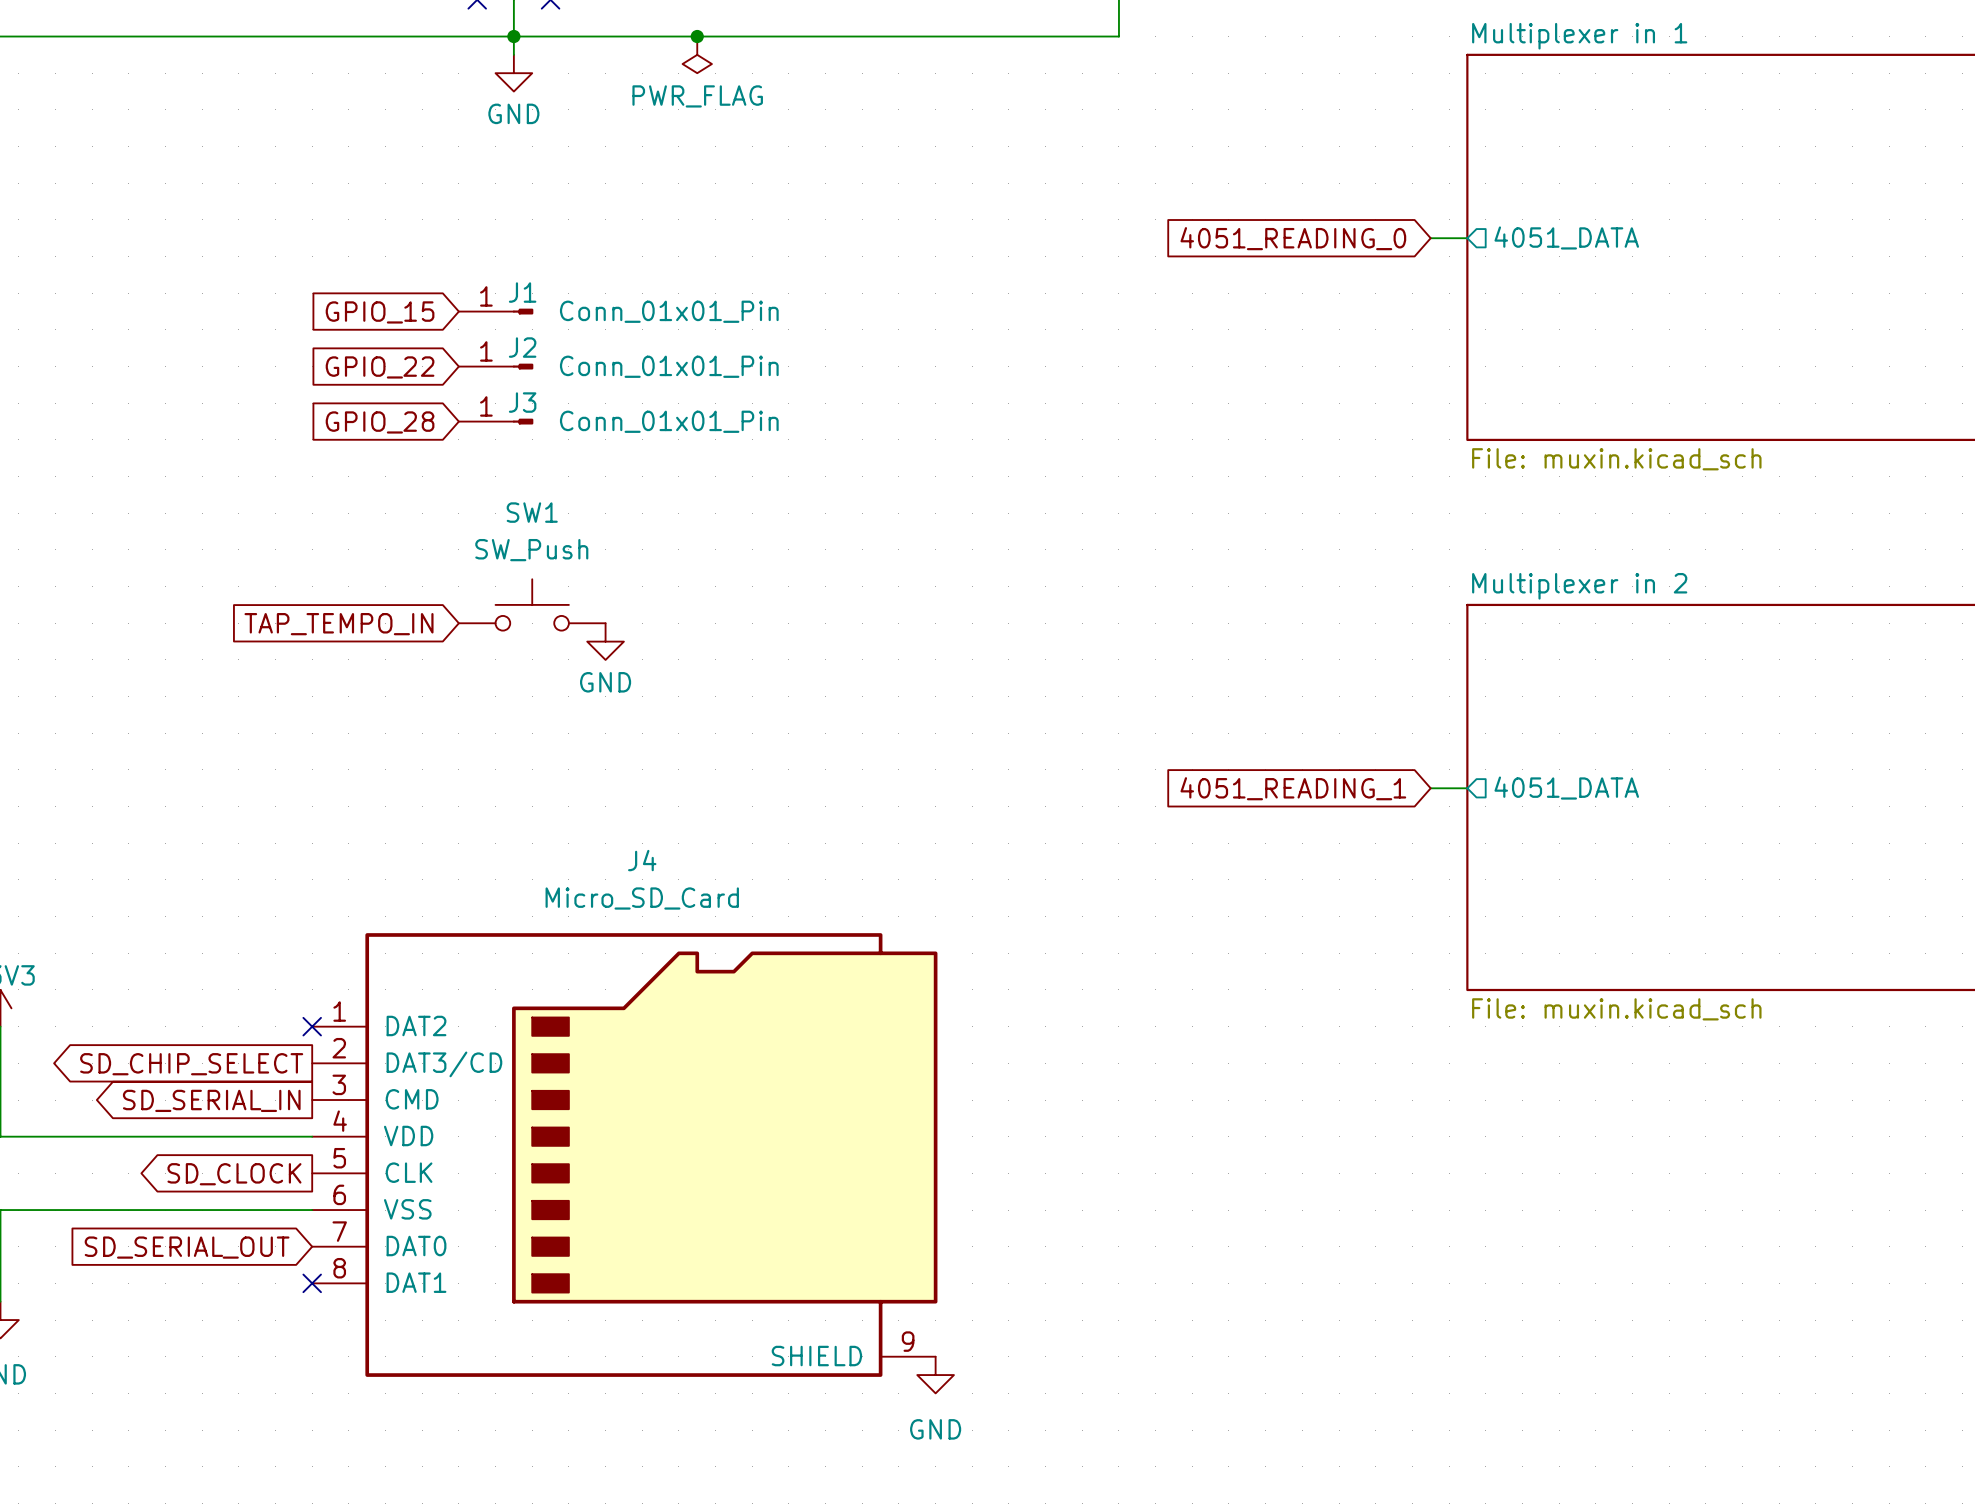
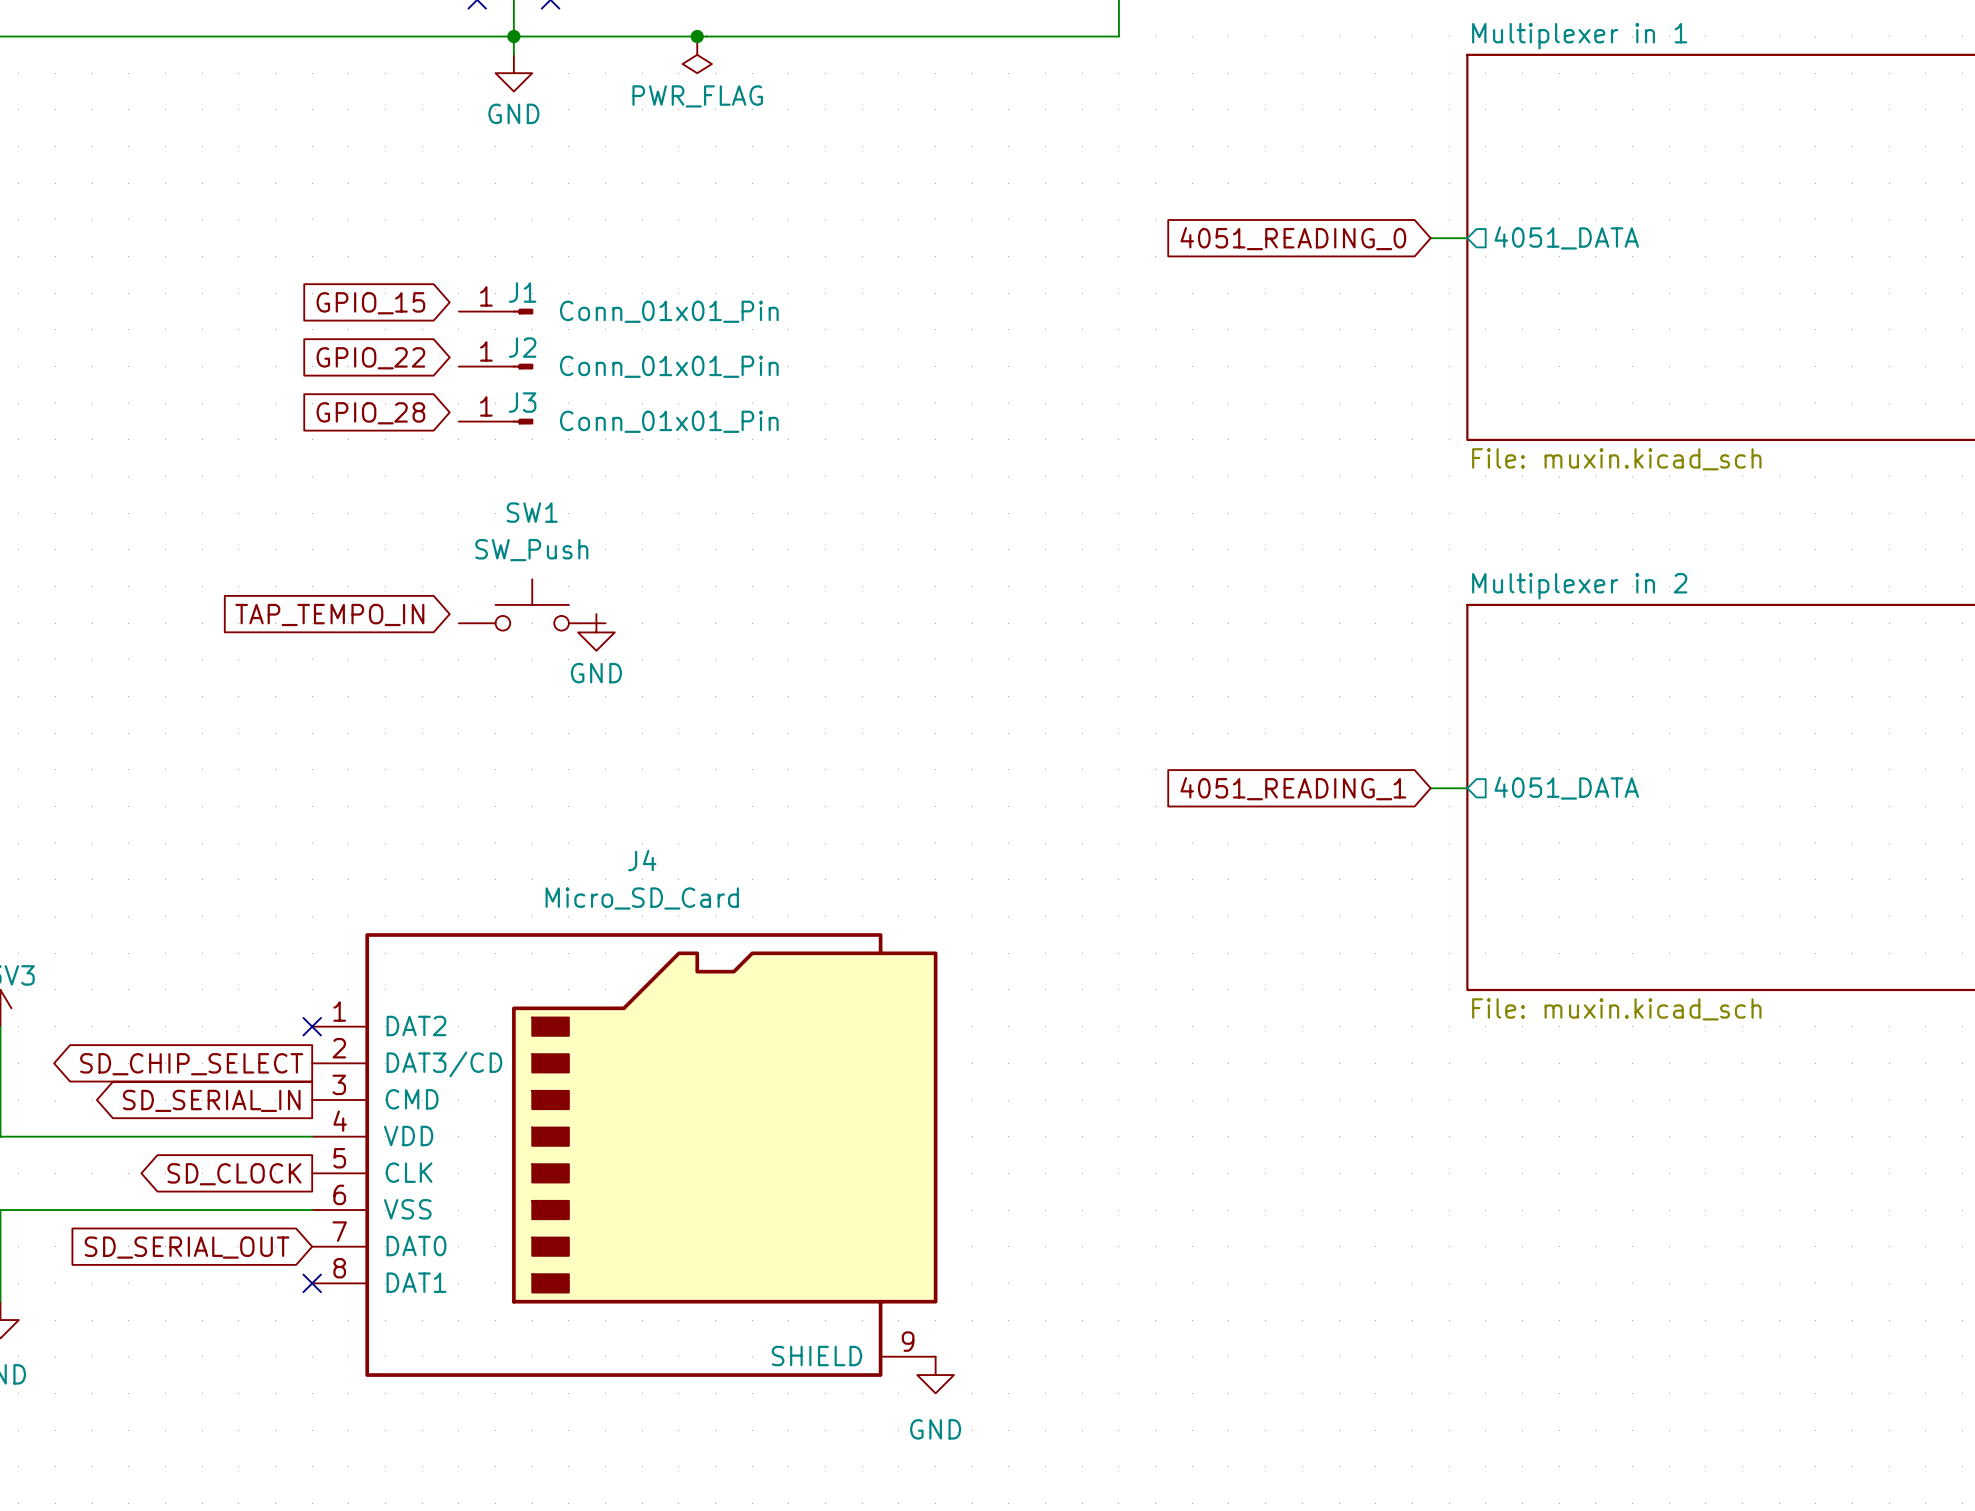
global label position: GPIO_15 (380, 312) -> GPIO_15 (370, 303)
global label position: GPIO_22 (380, 367) -> GPIO_22 (370, 358)
global label position: GPIO_28 (380, 422) -> GPIO_28 (370, 413)
global label position: TAP_TEMPO_IN (339, 624) -> TAP_TEMPO_IN (329, 614)
power symbol position: GND (605, 641) -> GND (596, 632)

